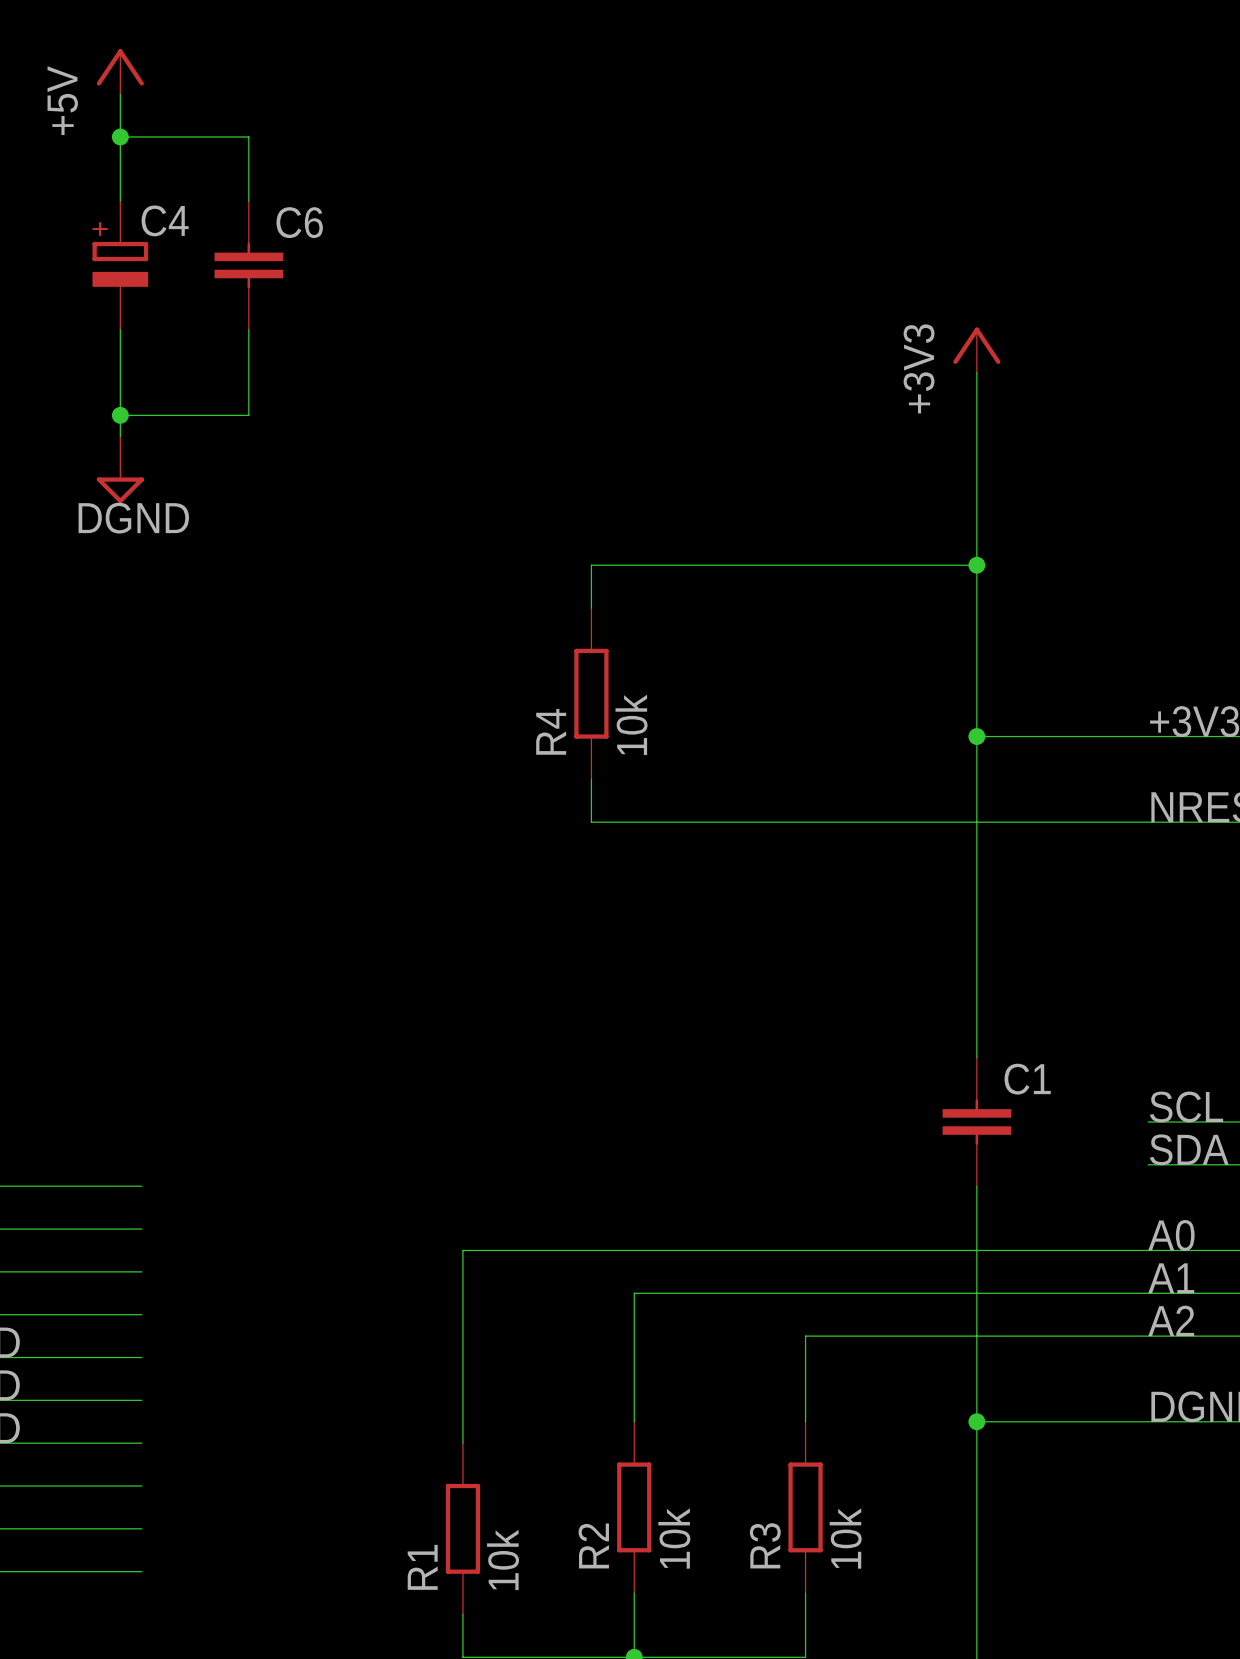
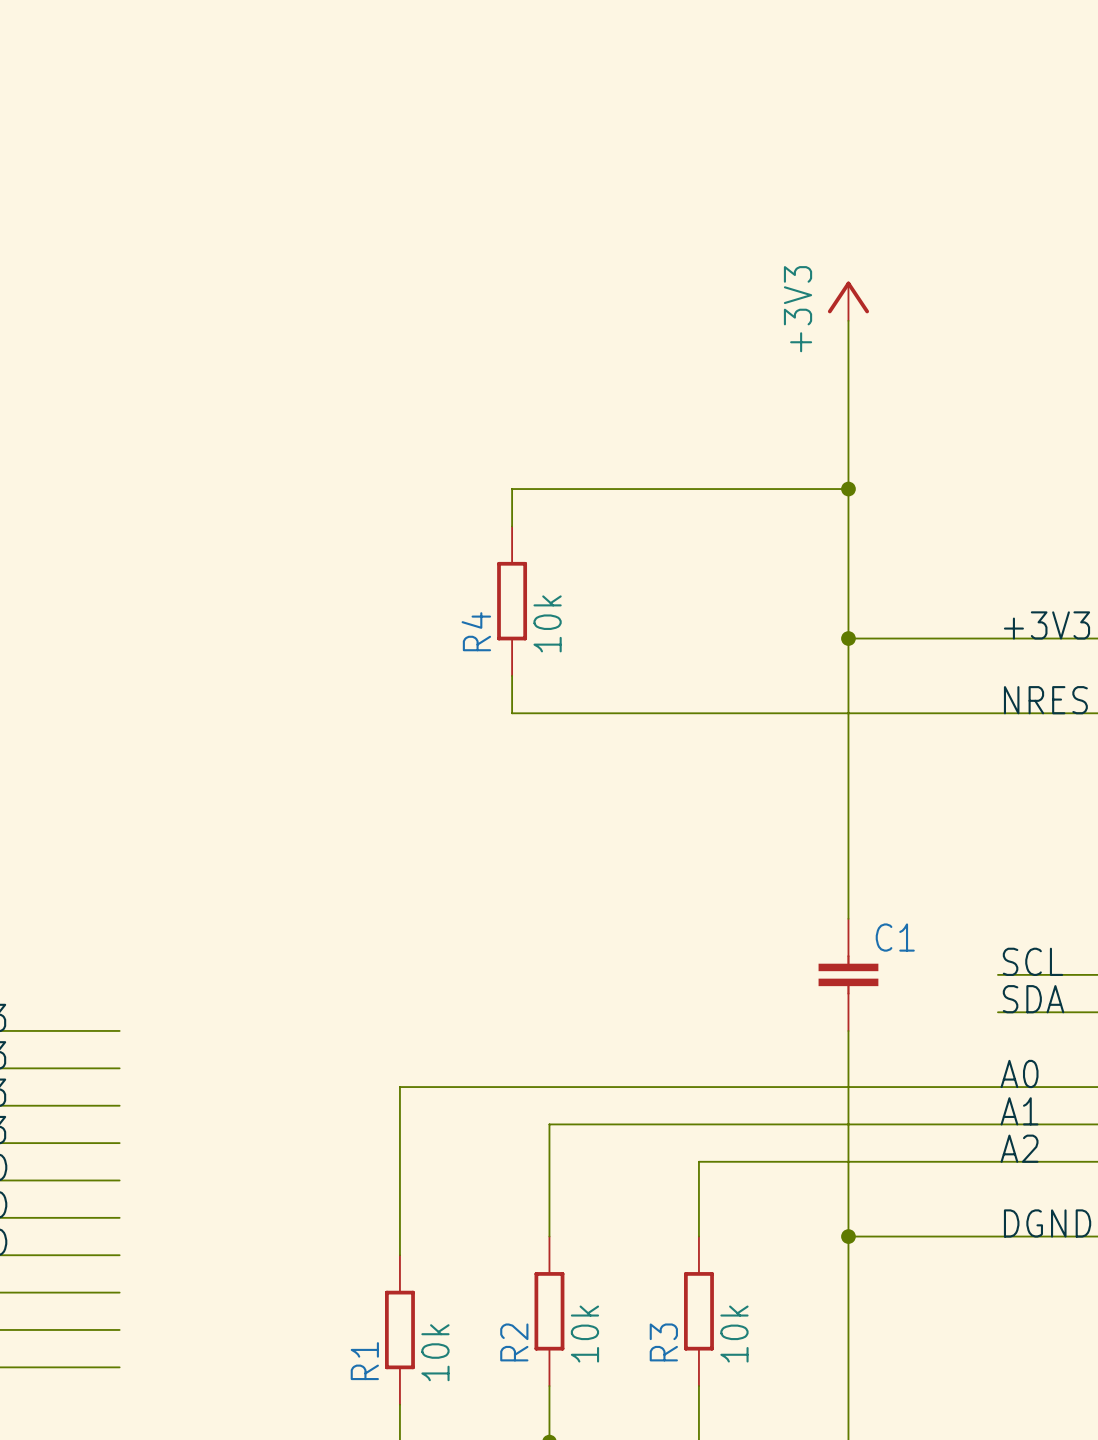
power symbol: +5V (120, 71) -> none
wire: (120, 94) (120, 201) -> none
wire: (120, 136) (248, 136) (248, 201) -> none
junction: (120, 136) -> none
C4: (120, 265) -> none
C6: (248, 265) -> none
wire: (120, 329) (120, 436) -> none
wire: (248, 329) (248, 415) (120, 415) -> none
junction: (120, 415) -> none
power symbol: DGND (120, 469) -> none

